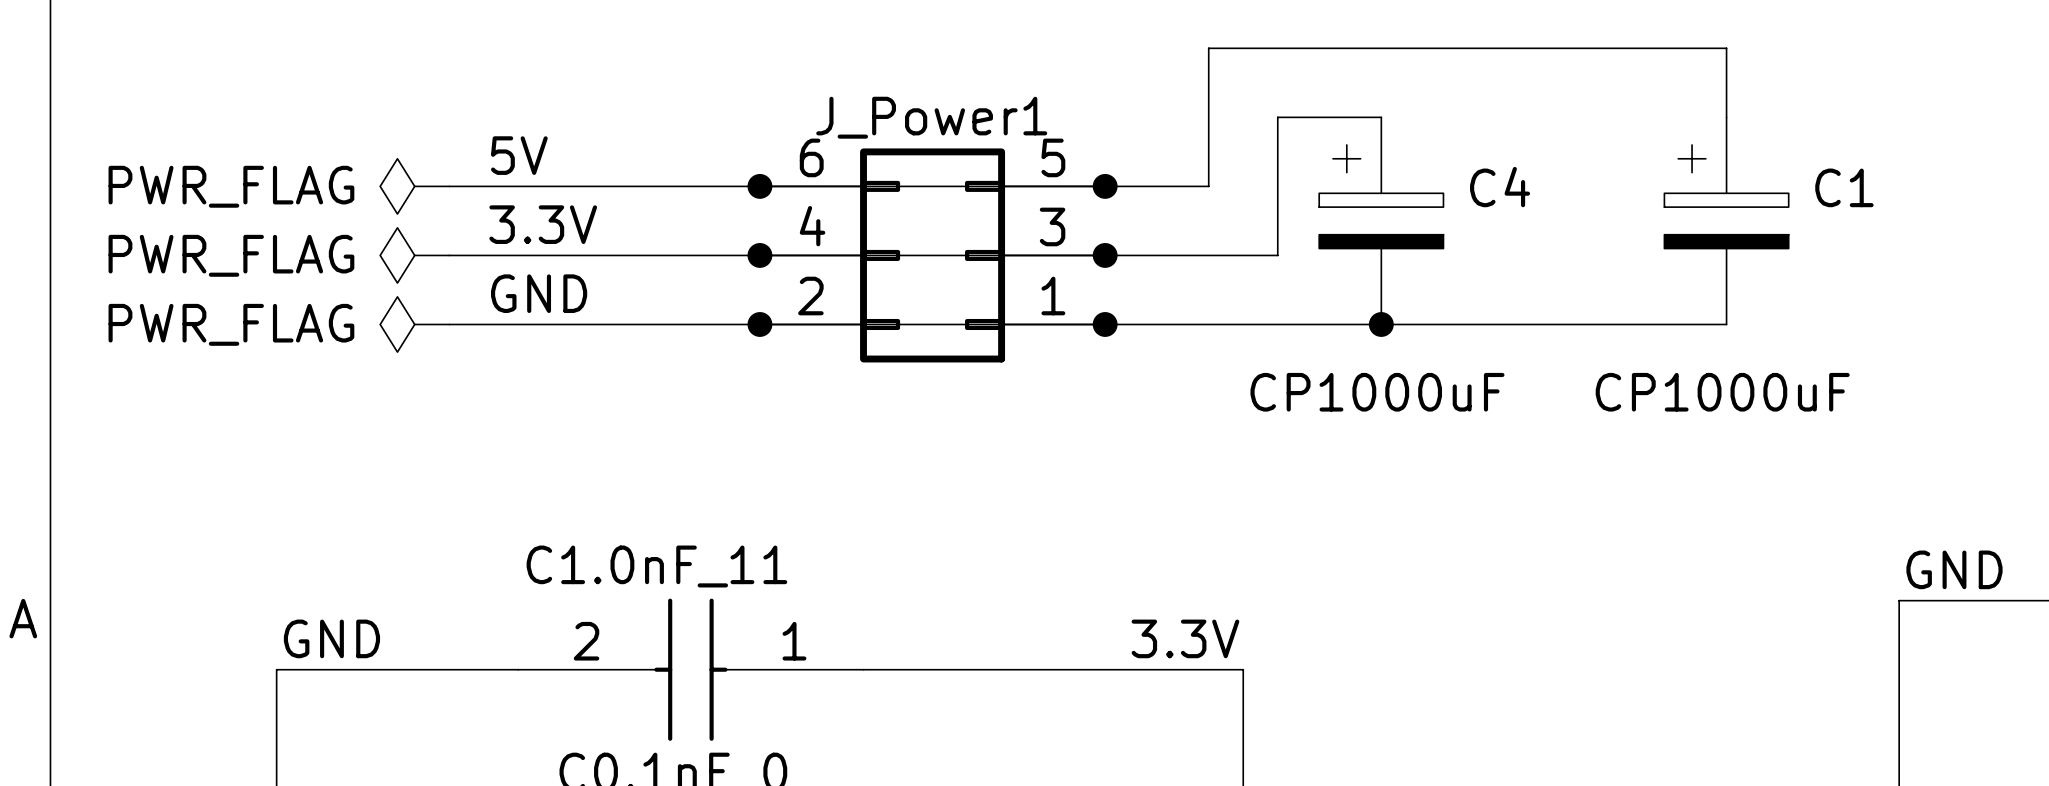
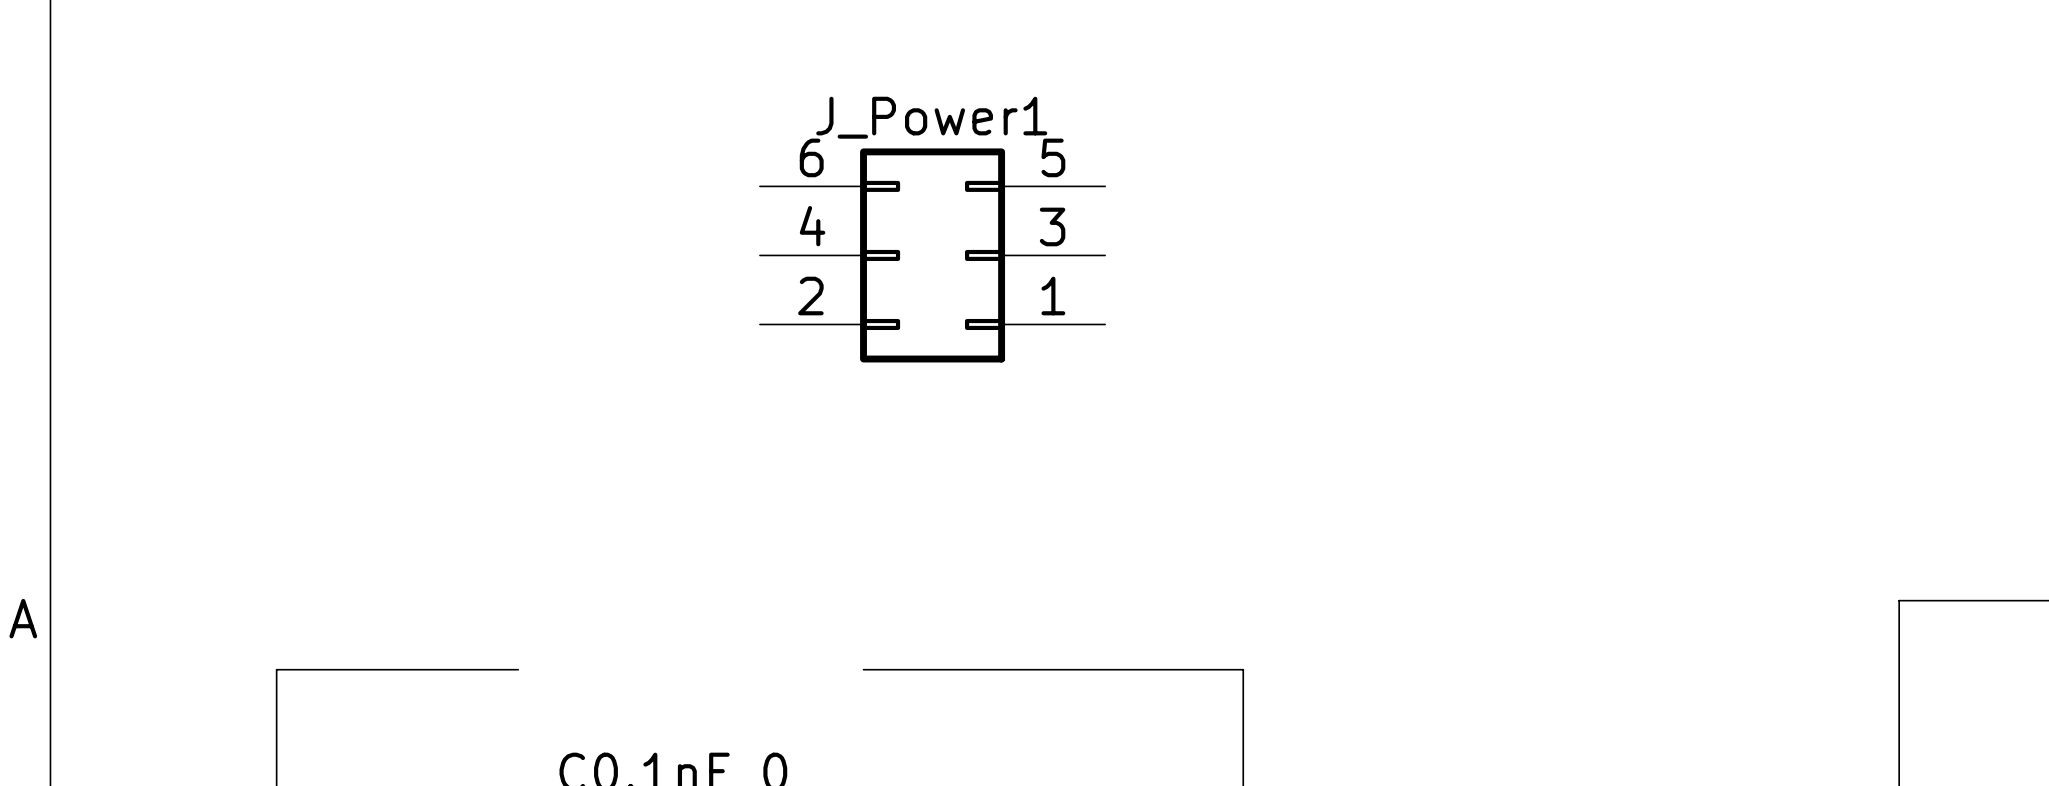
wire: (1381, 117) (1277, 117) (1277, 255) (449, 255) -> none
wire: (1726, 117) (1726, 48) (1208, 48) (1208, 186) (449, 186) -> none
label: 5V (519, 155) -> none
power symbol: PWR_FLAG (414, 186) -> none
junction: (759, 186) -> none
junction: (1105, 186) -> none
C4: CP1000uF (1381, 220) -> none
C1: CP1000uF (1726, 220) -> none
label: 3.3V (543, 224) -> none
power symbol: PWR_FLAG (414, 255) -> none
junction: (759, 255) -> none
junction: (1105, 255) -> none
label: GND (539, 293) -> none
power symbol: PWR_FLAG (414, 324) -> none
wire: (449, 324) (1726, 324) -> none
junction: (759, 324) -> none
junction: (1105, 324) -> none
junction: (1381, 324) -> none
label: GND (1954, 569) -> none
label: GND (331, 638) -> none
label: 3.3V (1185, 638) -> none
C1.0nF_11: (690, 669) -> none

